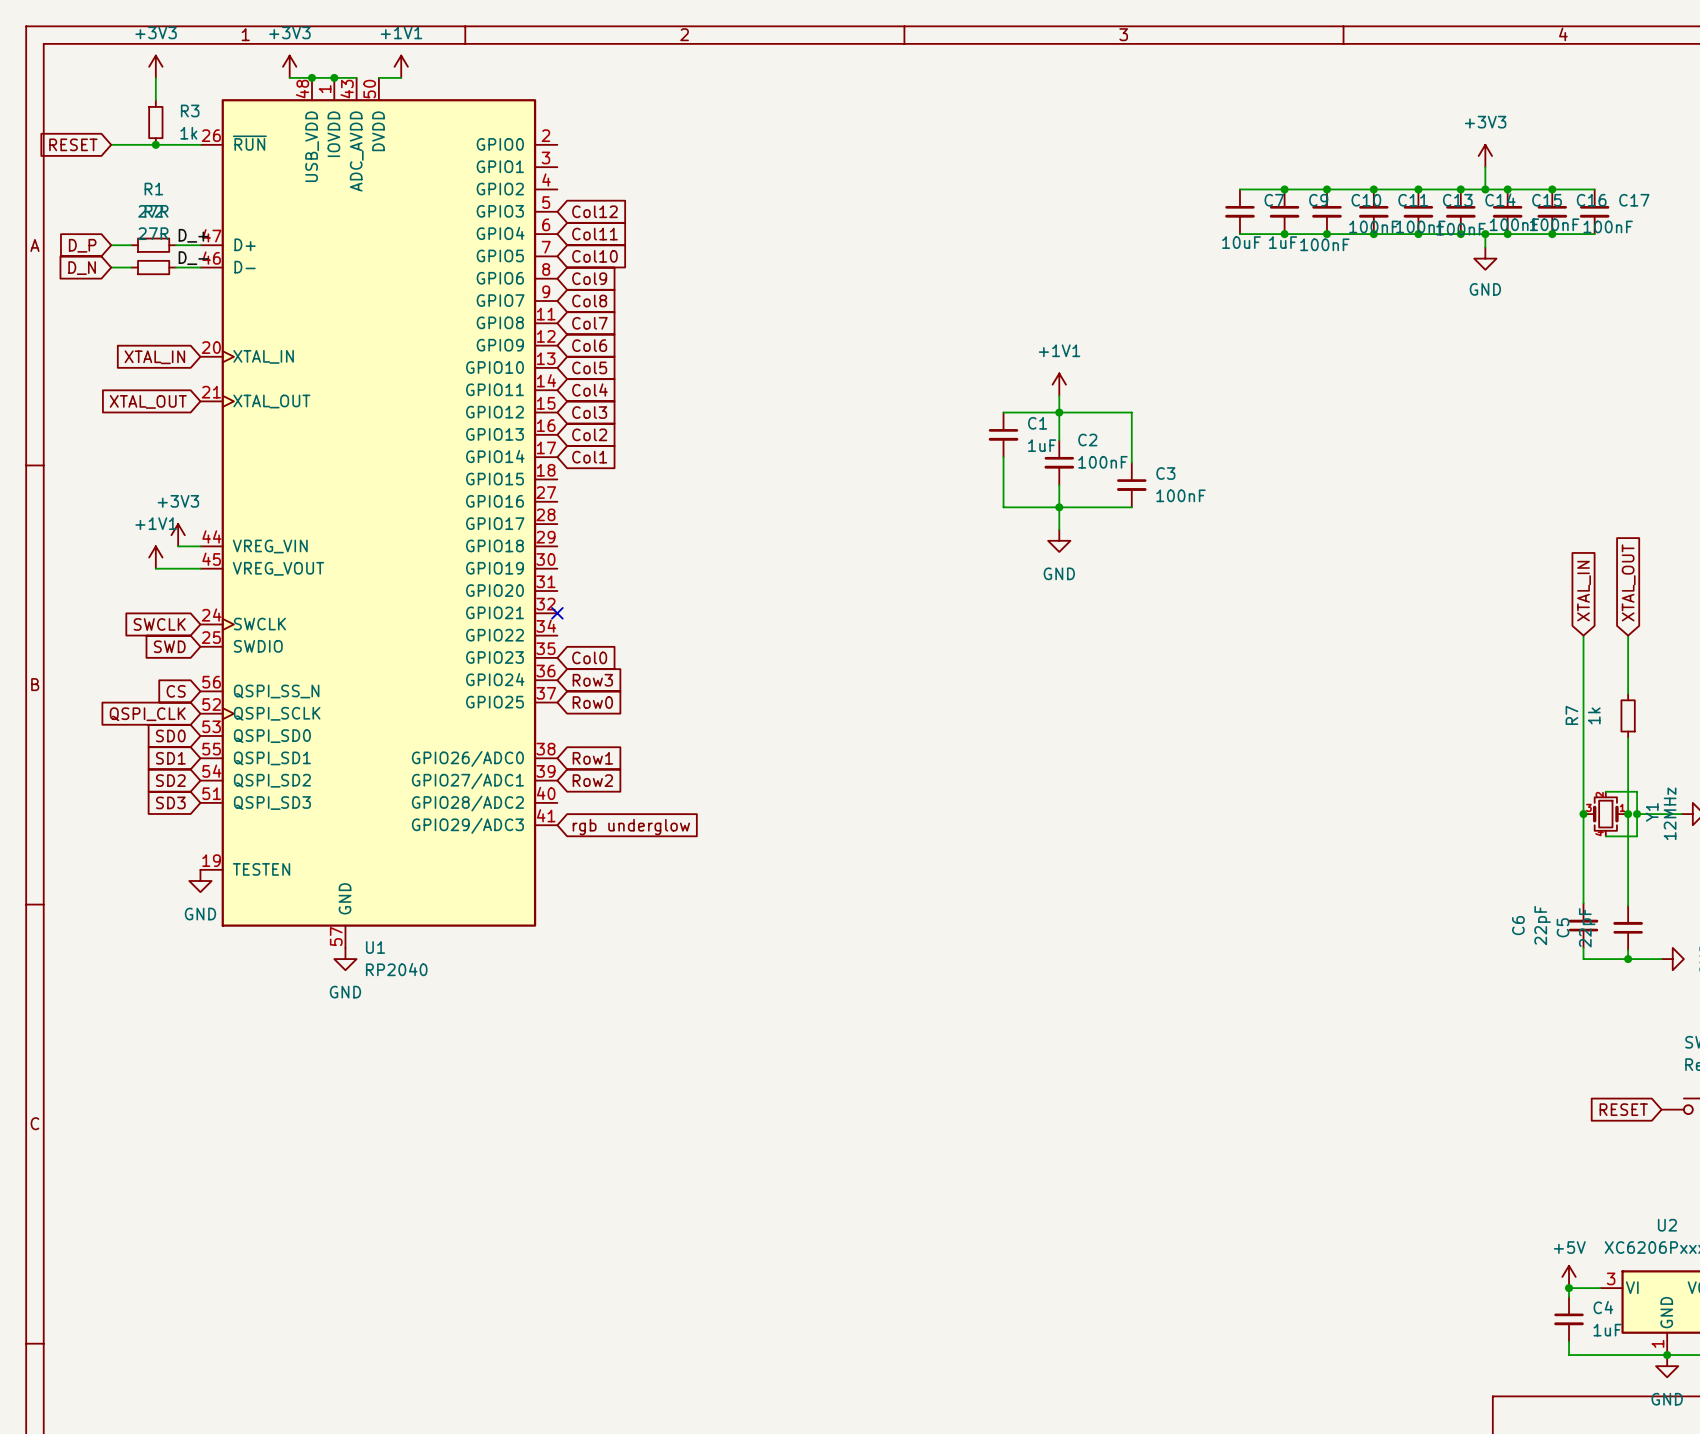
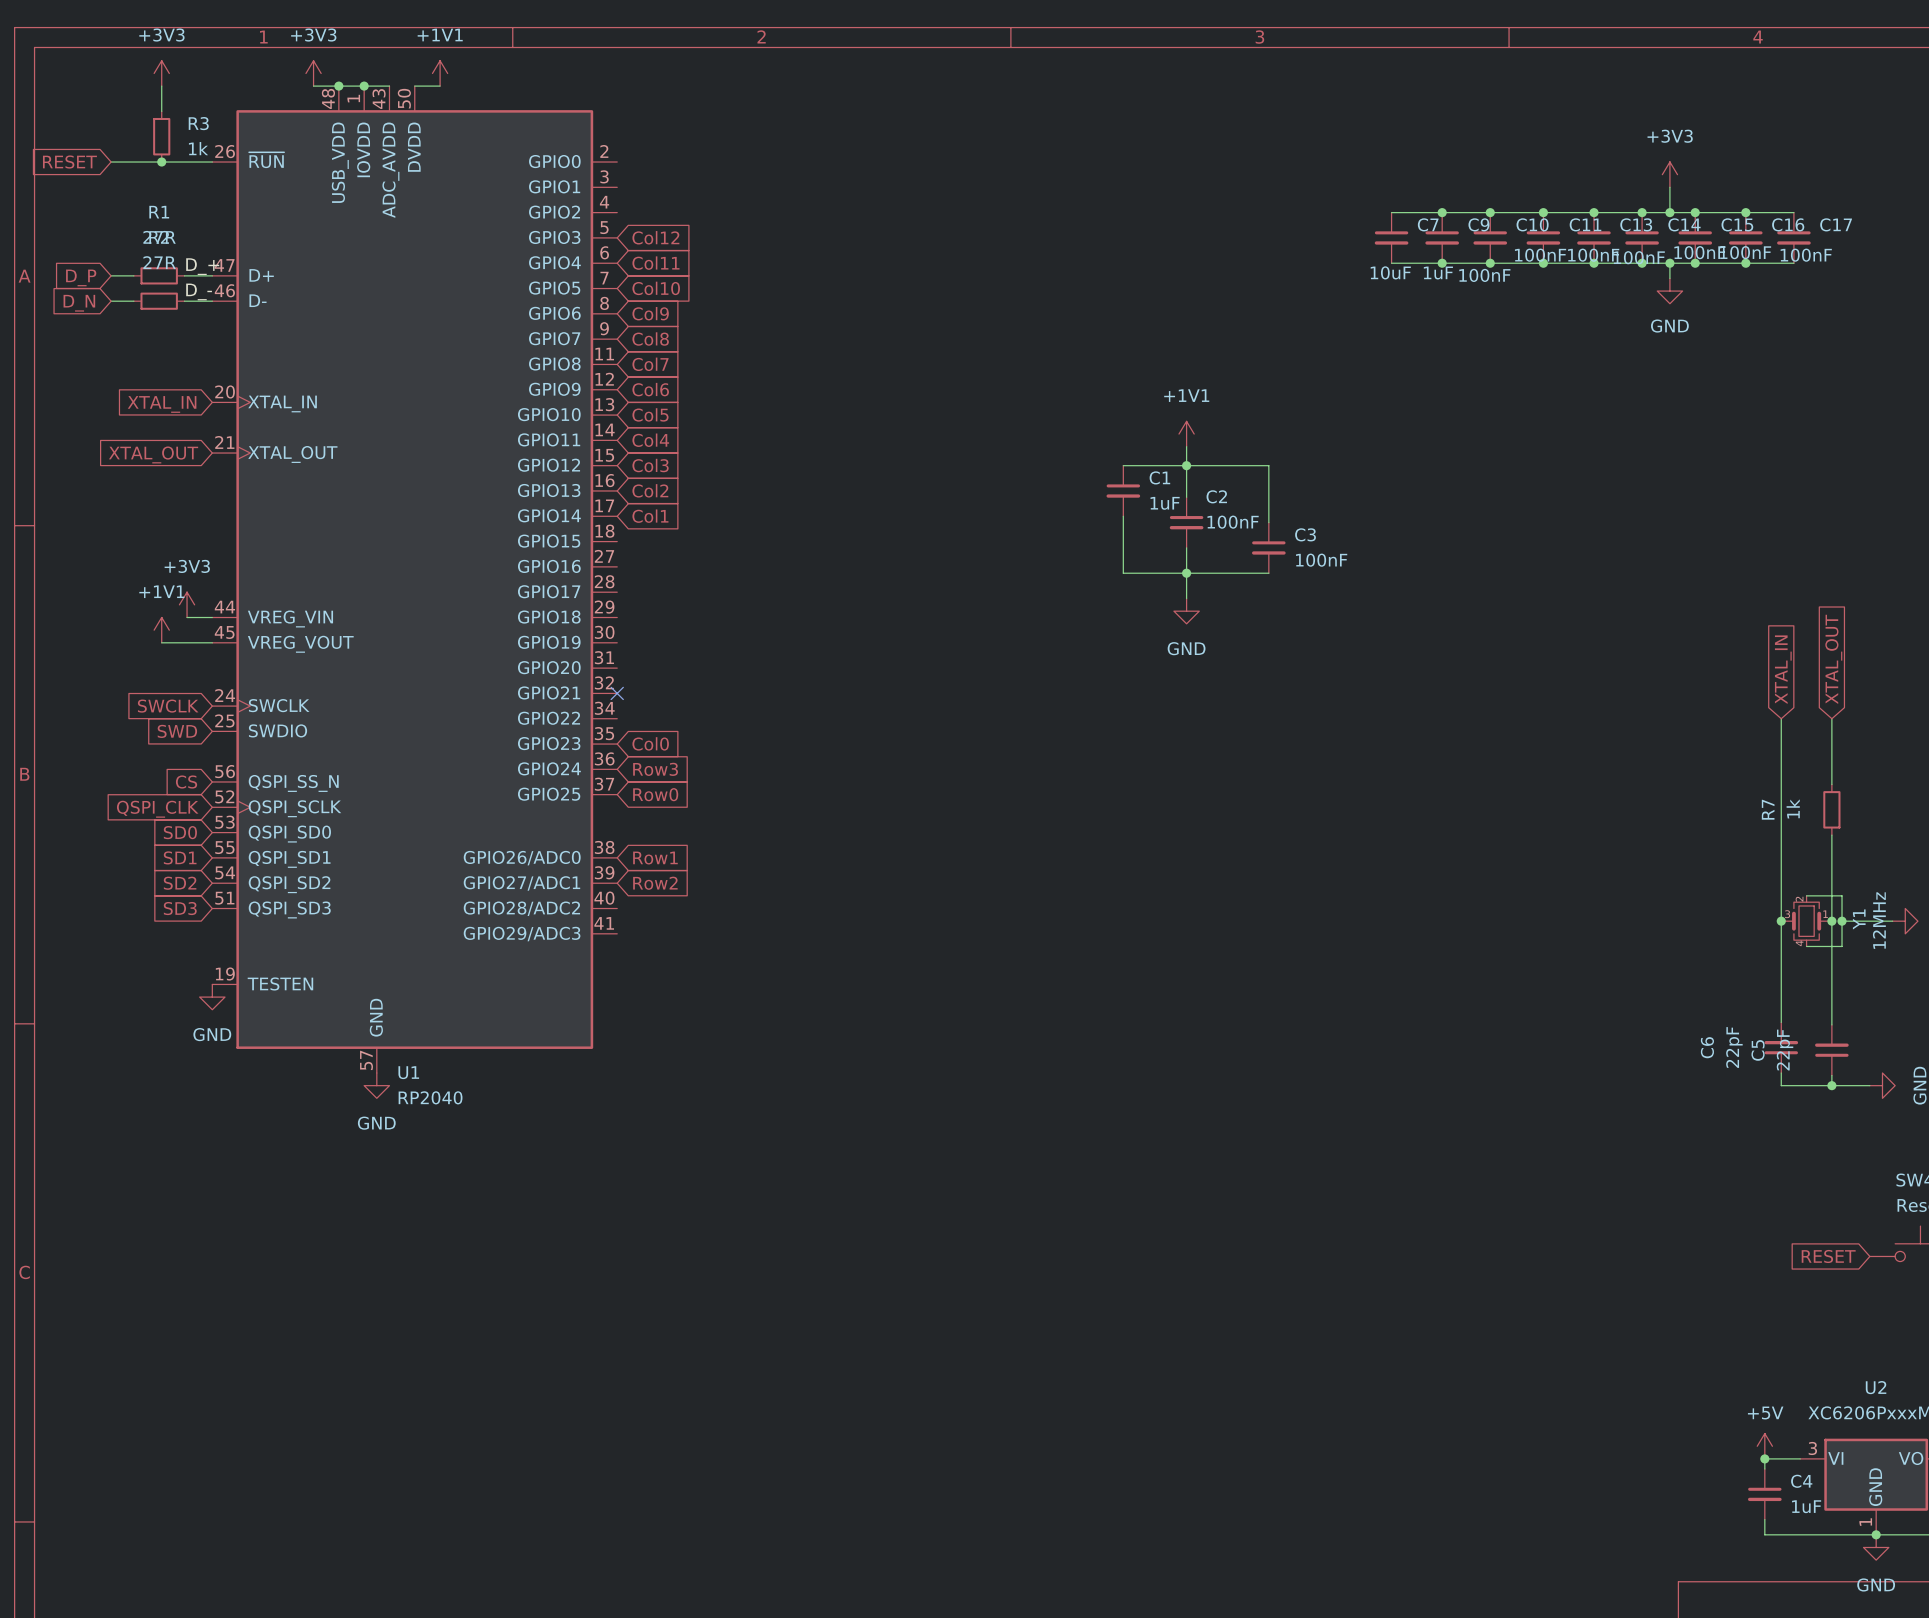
global label: rgb underglow (631, 827) -> none

